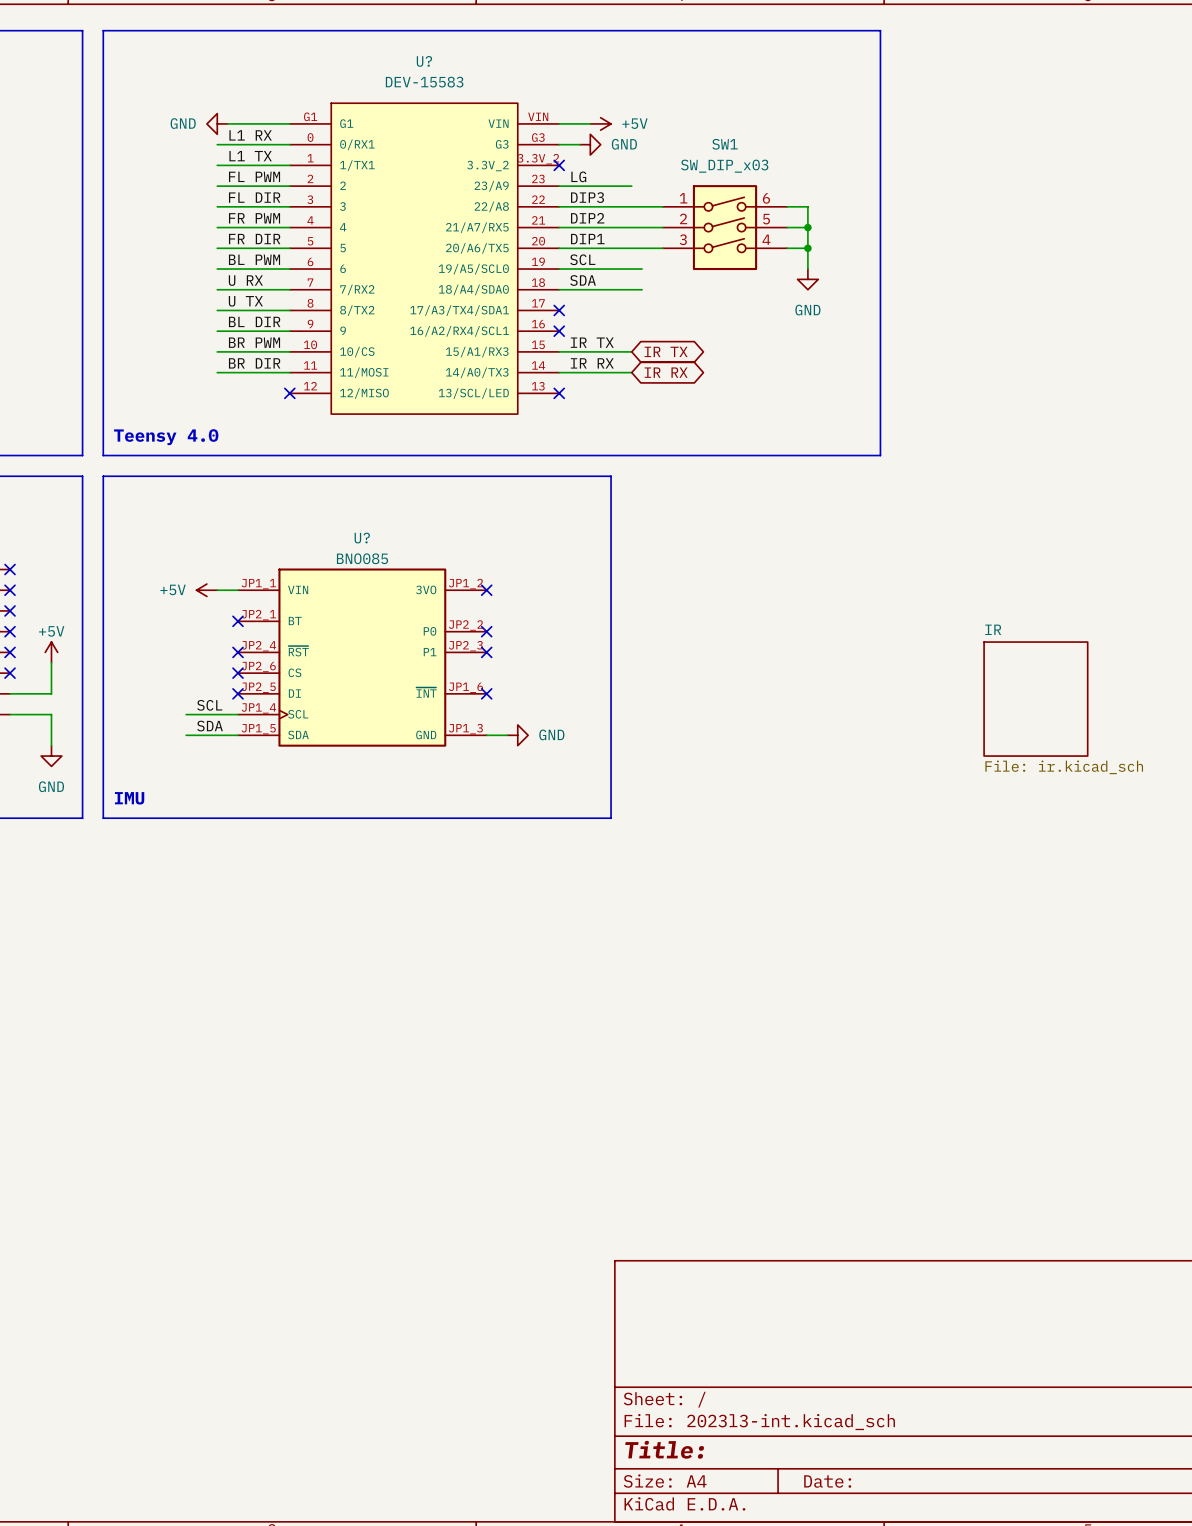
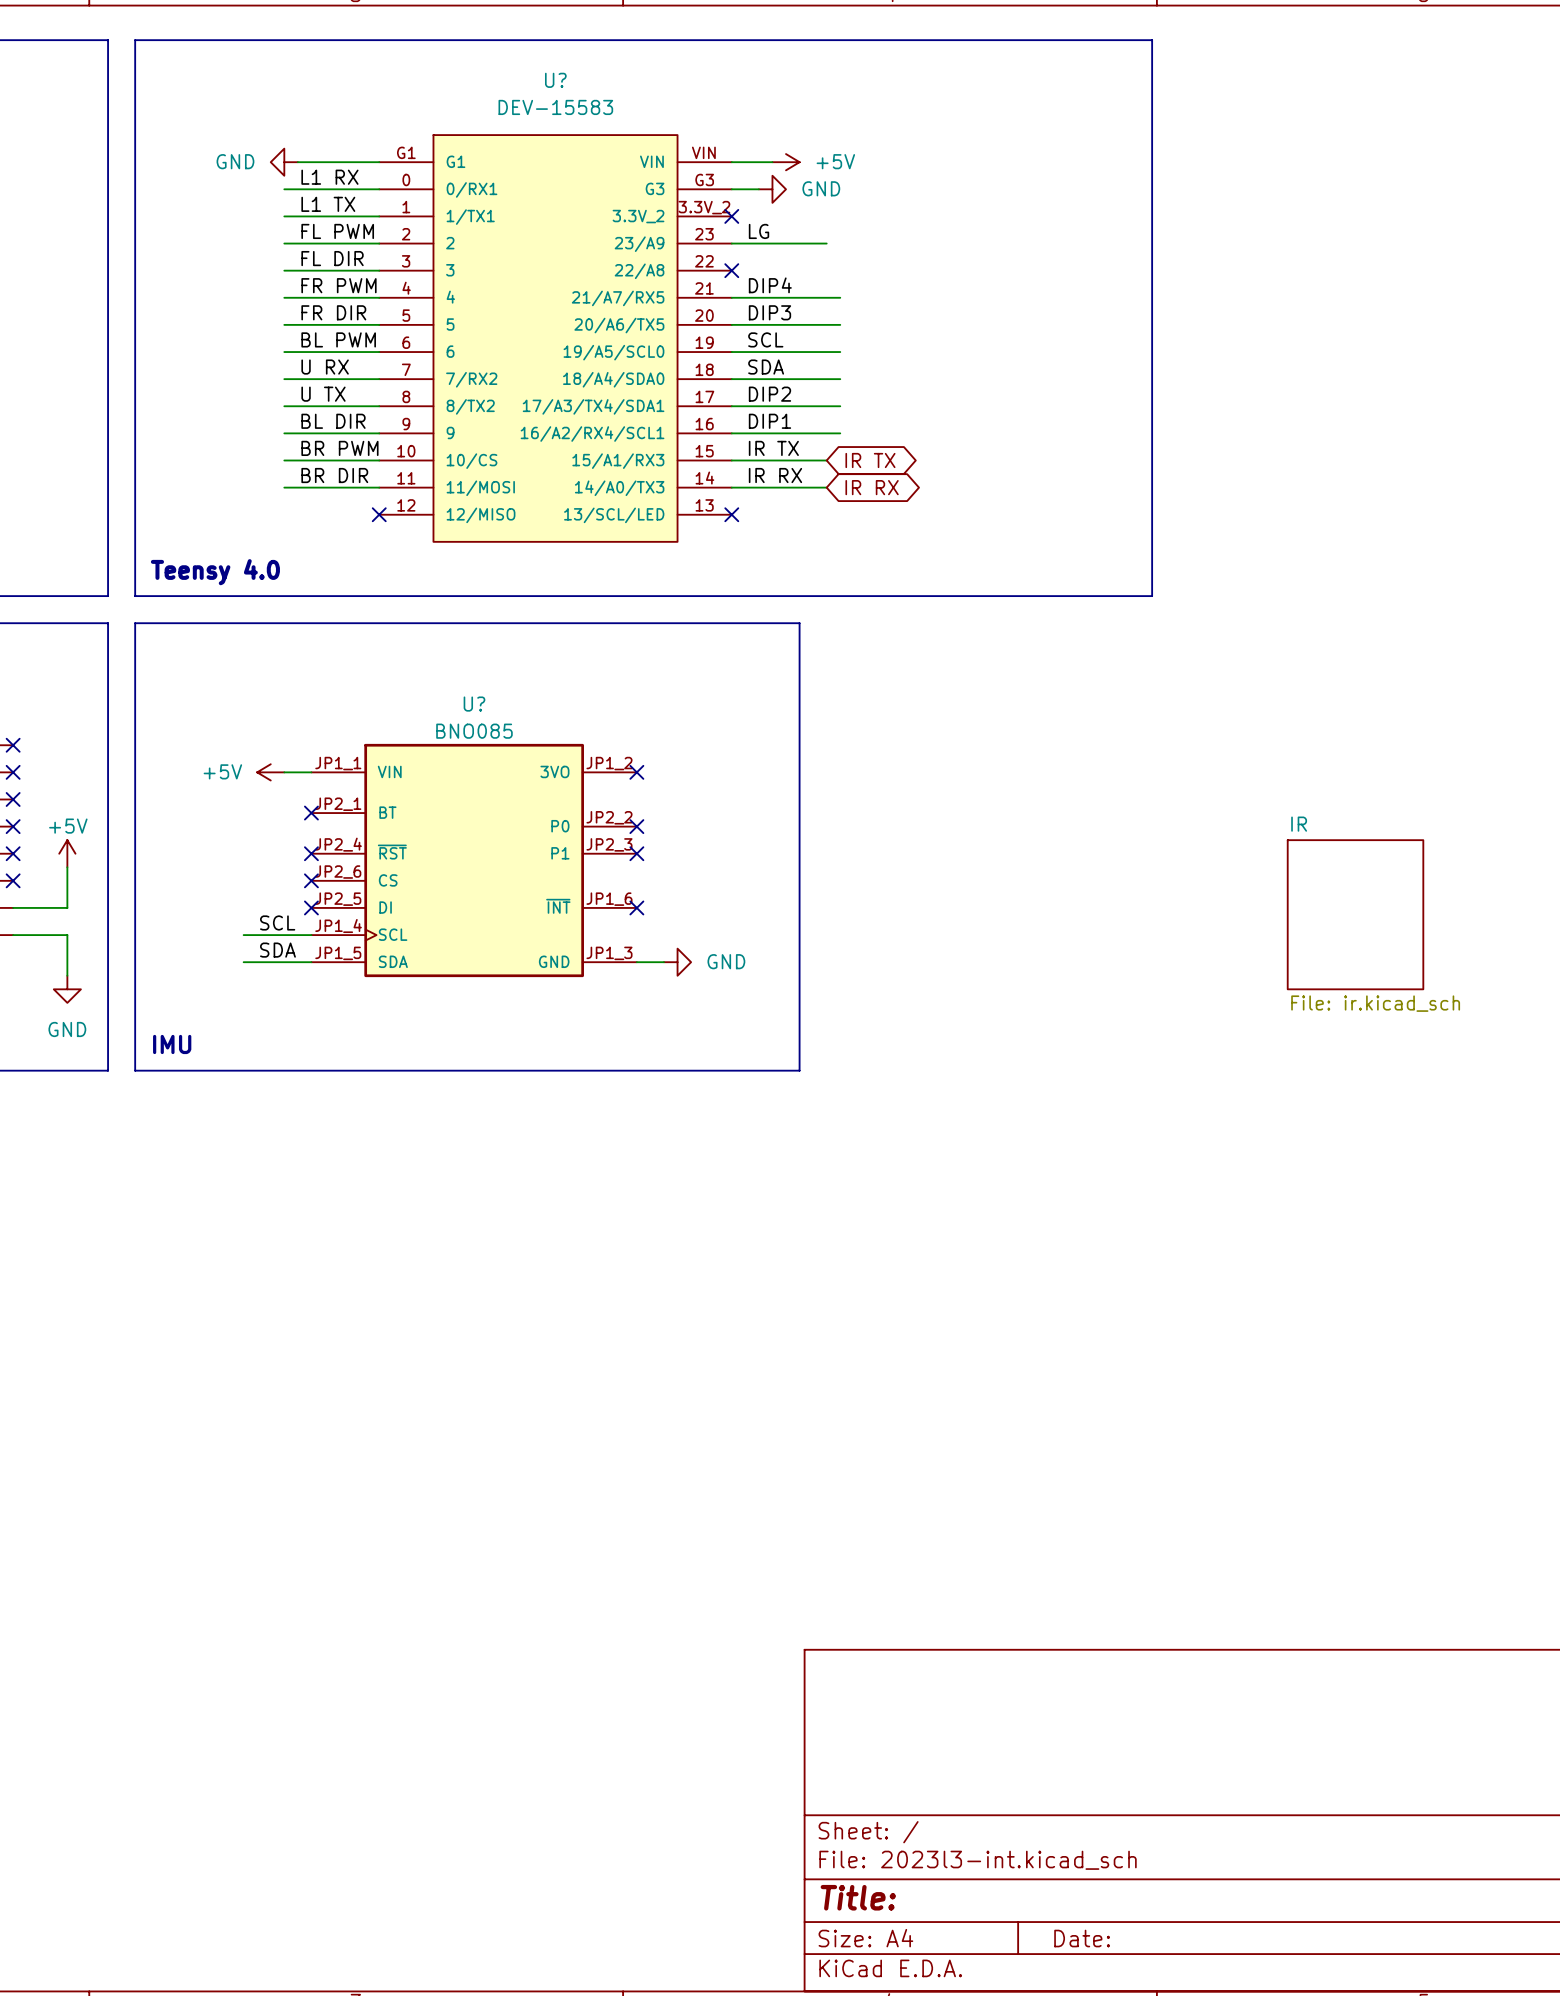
label: DIP3 (587, 197) -> none
wire: (559, 206) (662, 206) -> none
no-connect mark: none -> (731, 270)
wire: (787, 206) (807, 206) (807, 269) -> none
label: DIP2 (587, 218) -> DIP4 (770, 285)
wire: (642, 227) (662, 227) -> none
SW1: SW_DIP_x03 (725, 227) -> none
wire: (787, 227) (807, 227) -> none
junction: (807, 227) -> none
label: DIP1 (587, 239) -> DIP3 (769, 312)
wire: (642, 248) (662, 248) -> none
wire: (787, 248) (807, 248) -> none
junction: (807, 248) -> none
power symbol: GND (807, 279) -> none
label: none -> DIP2 (769, 394)
wire: none -> (731, 406) (840, 406)
no-connect mark: (559, 310) -> none
label: none -> DIP1 (769, 421)
wire: none -> (731, 433) (840, 433)
no-connect mark: (559, 331) -> none

